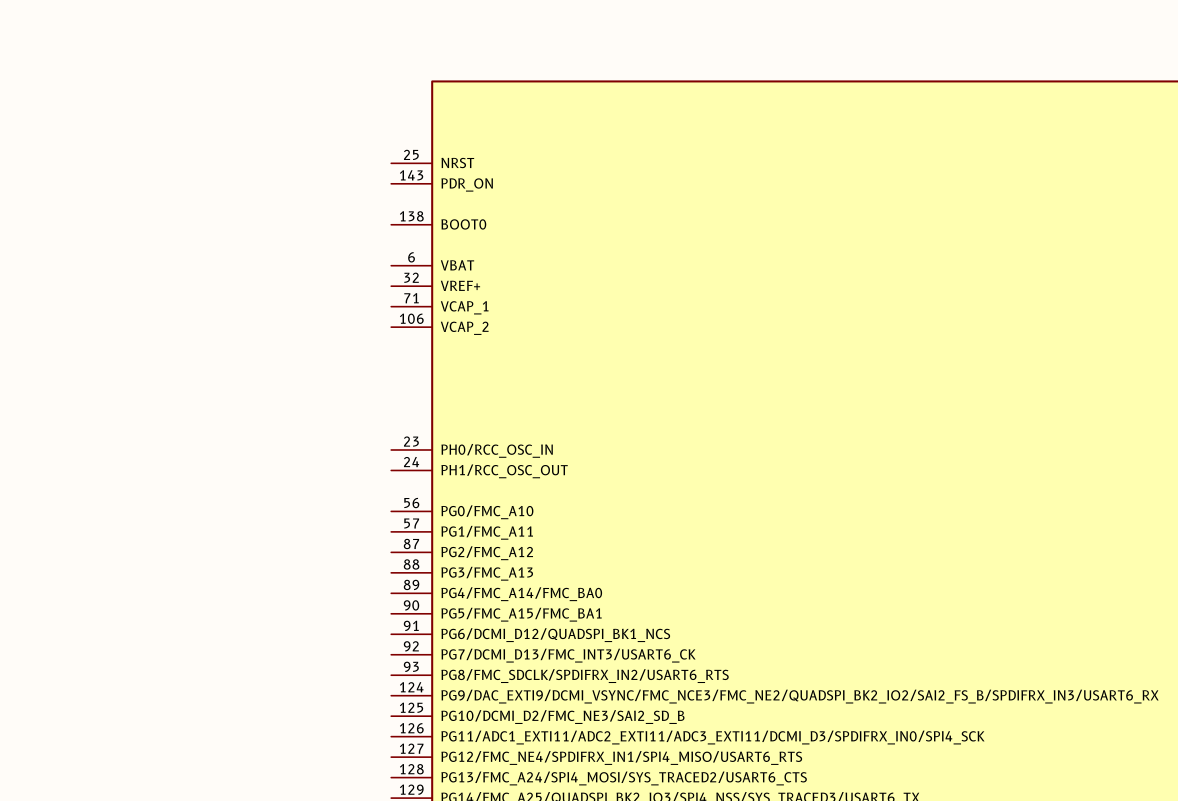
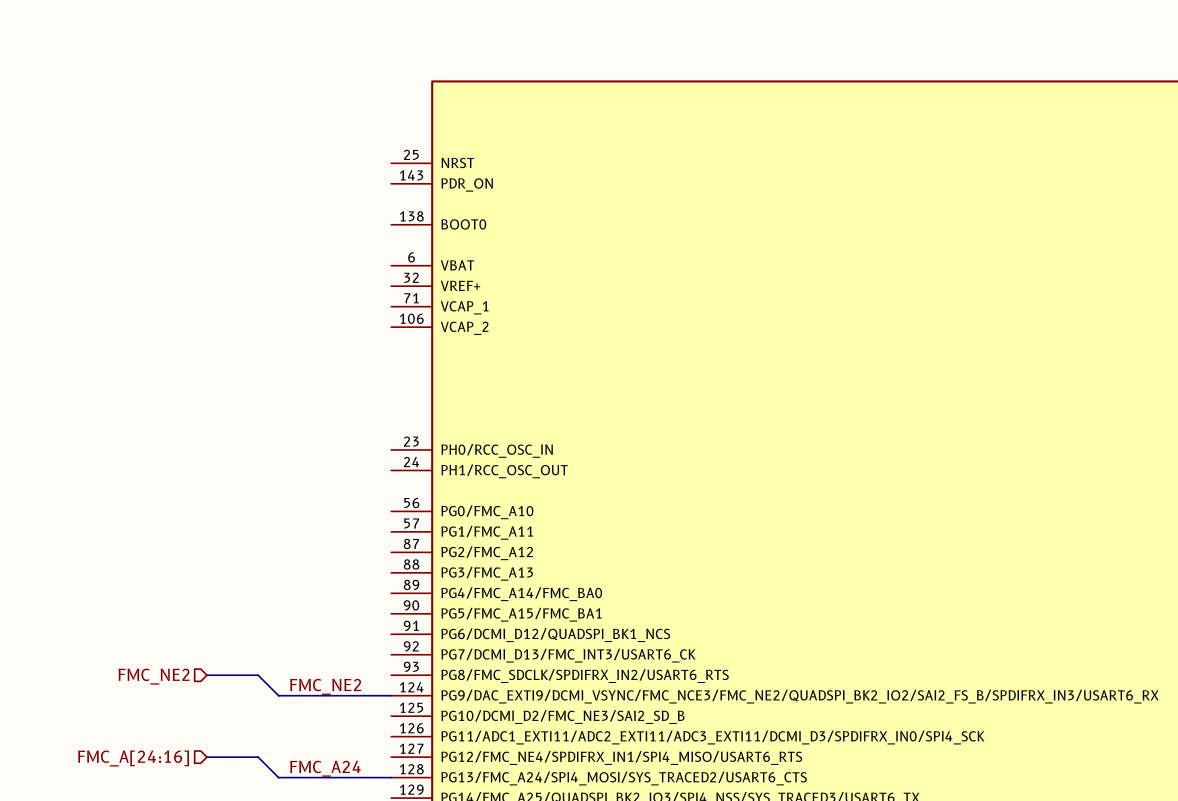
bus: none -> (206, 675) (258, 675)
wire: none -> (258, 675) (278, 695) (391, 695)
hierarchical label: none -> FMC_NE2 (154, 676)
label: none -> FMC_NE2 (325, 686)
bus: none -> (206, 757) (258, 757)
wire: none -> (258, 757) (278, 777) (391, 777)
hierarchical label: none -> FMC_A[24:16] (133, 758)
label: none -> FMC_A24 (325, 768)

